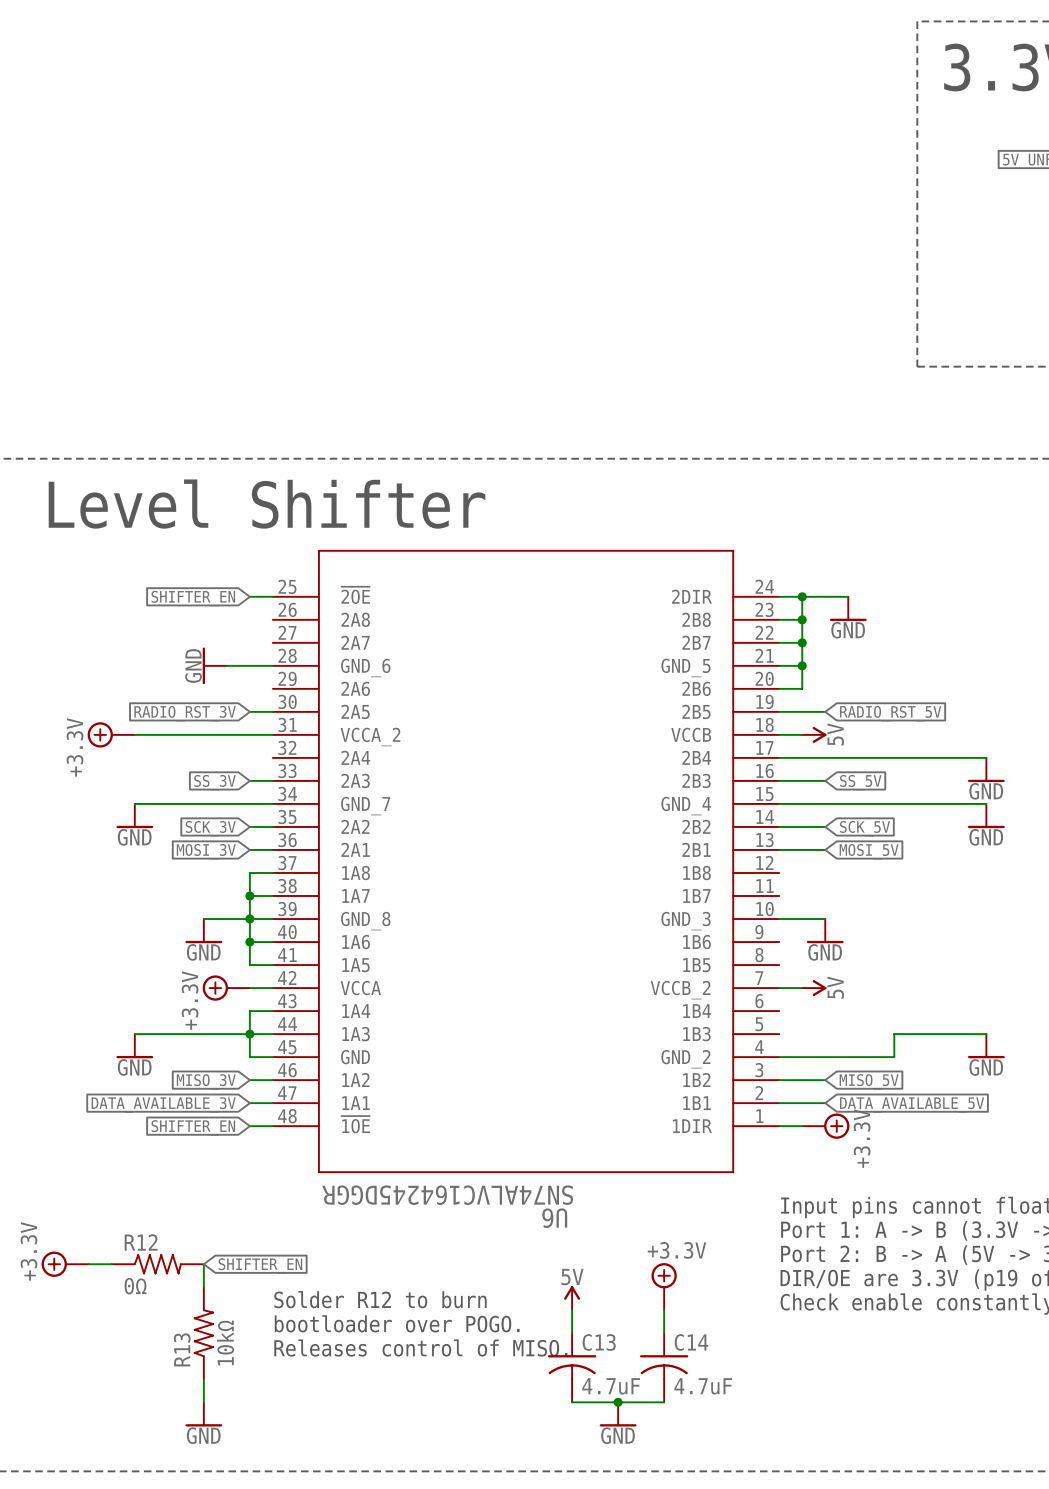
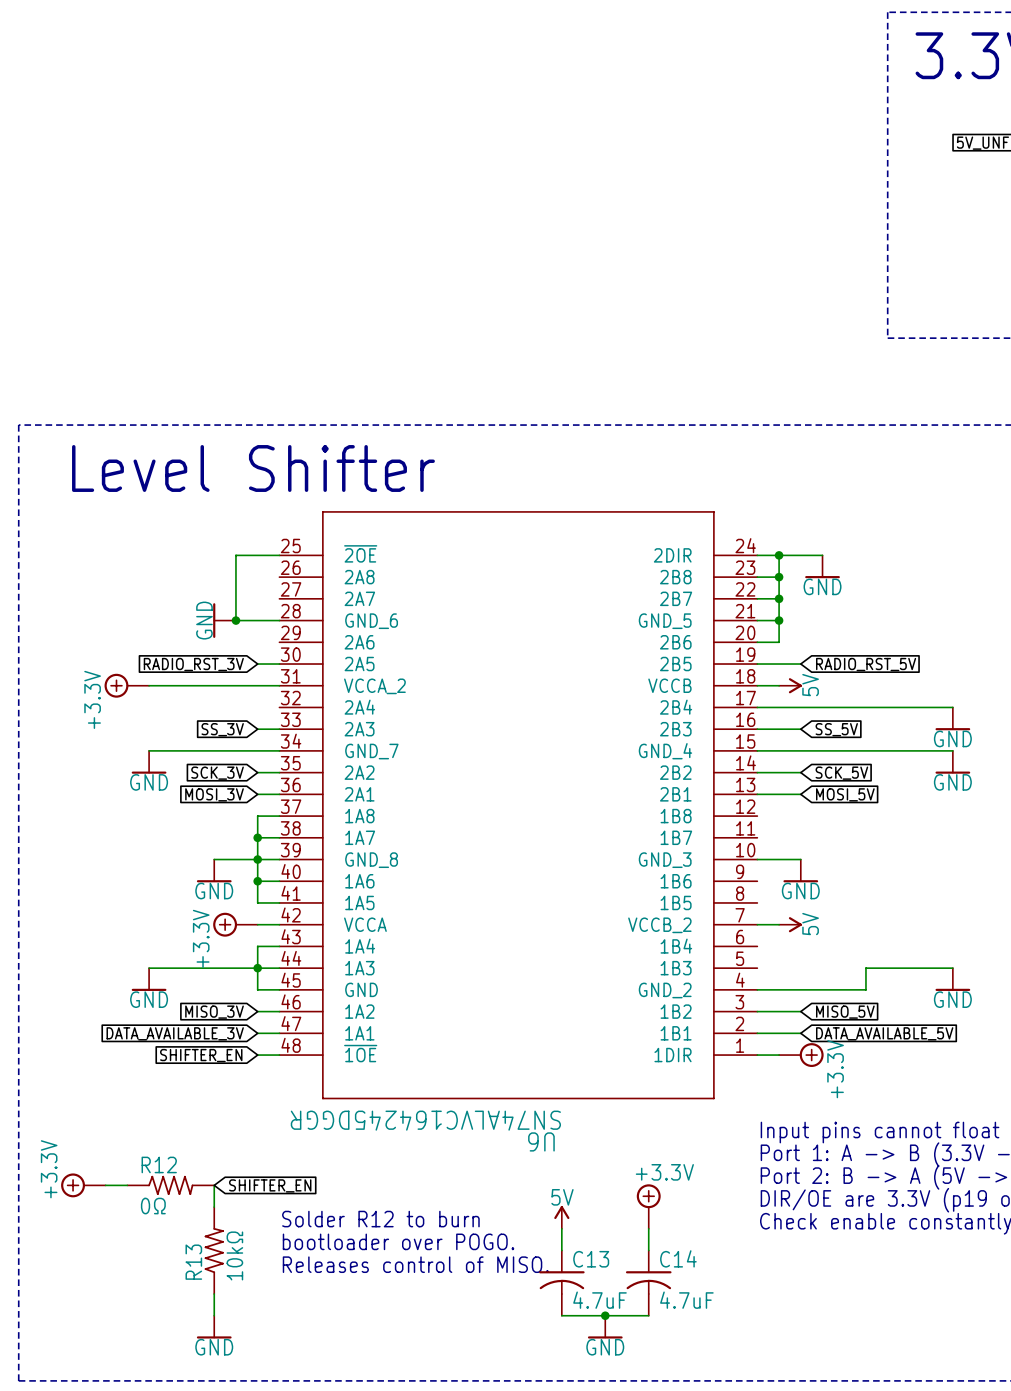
wire: none -> (257, 555) (235, 555) (235, 620)
global label: SHIFTER_EN (193, 598) -> none
junction: none -> (235, 620)

